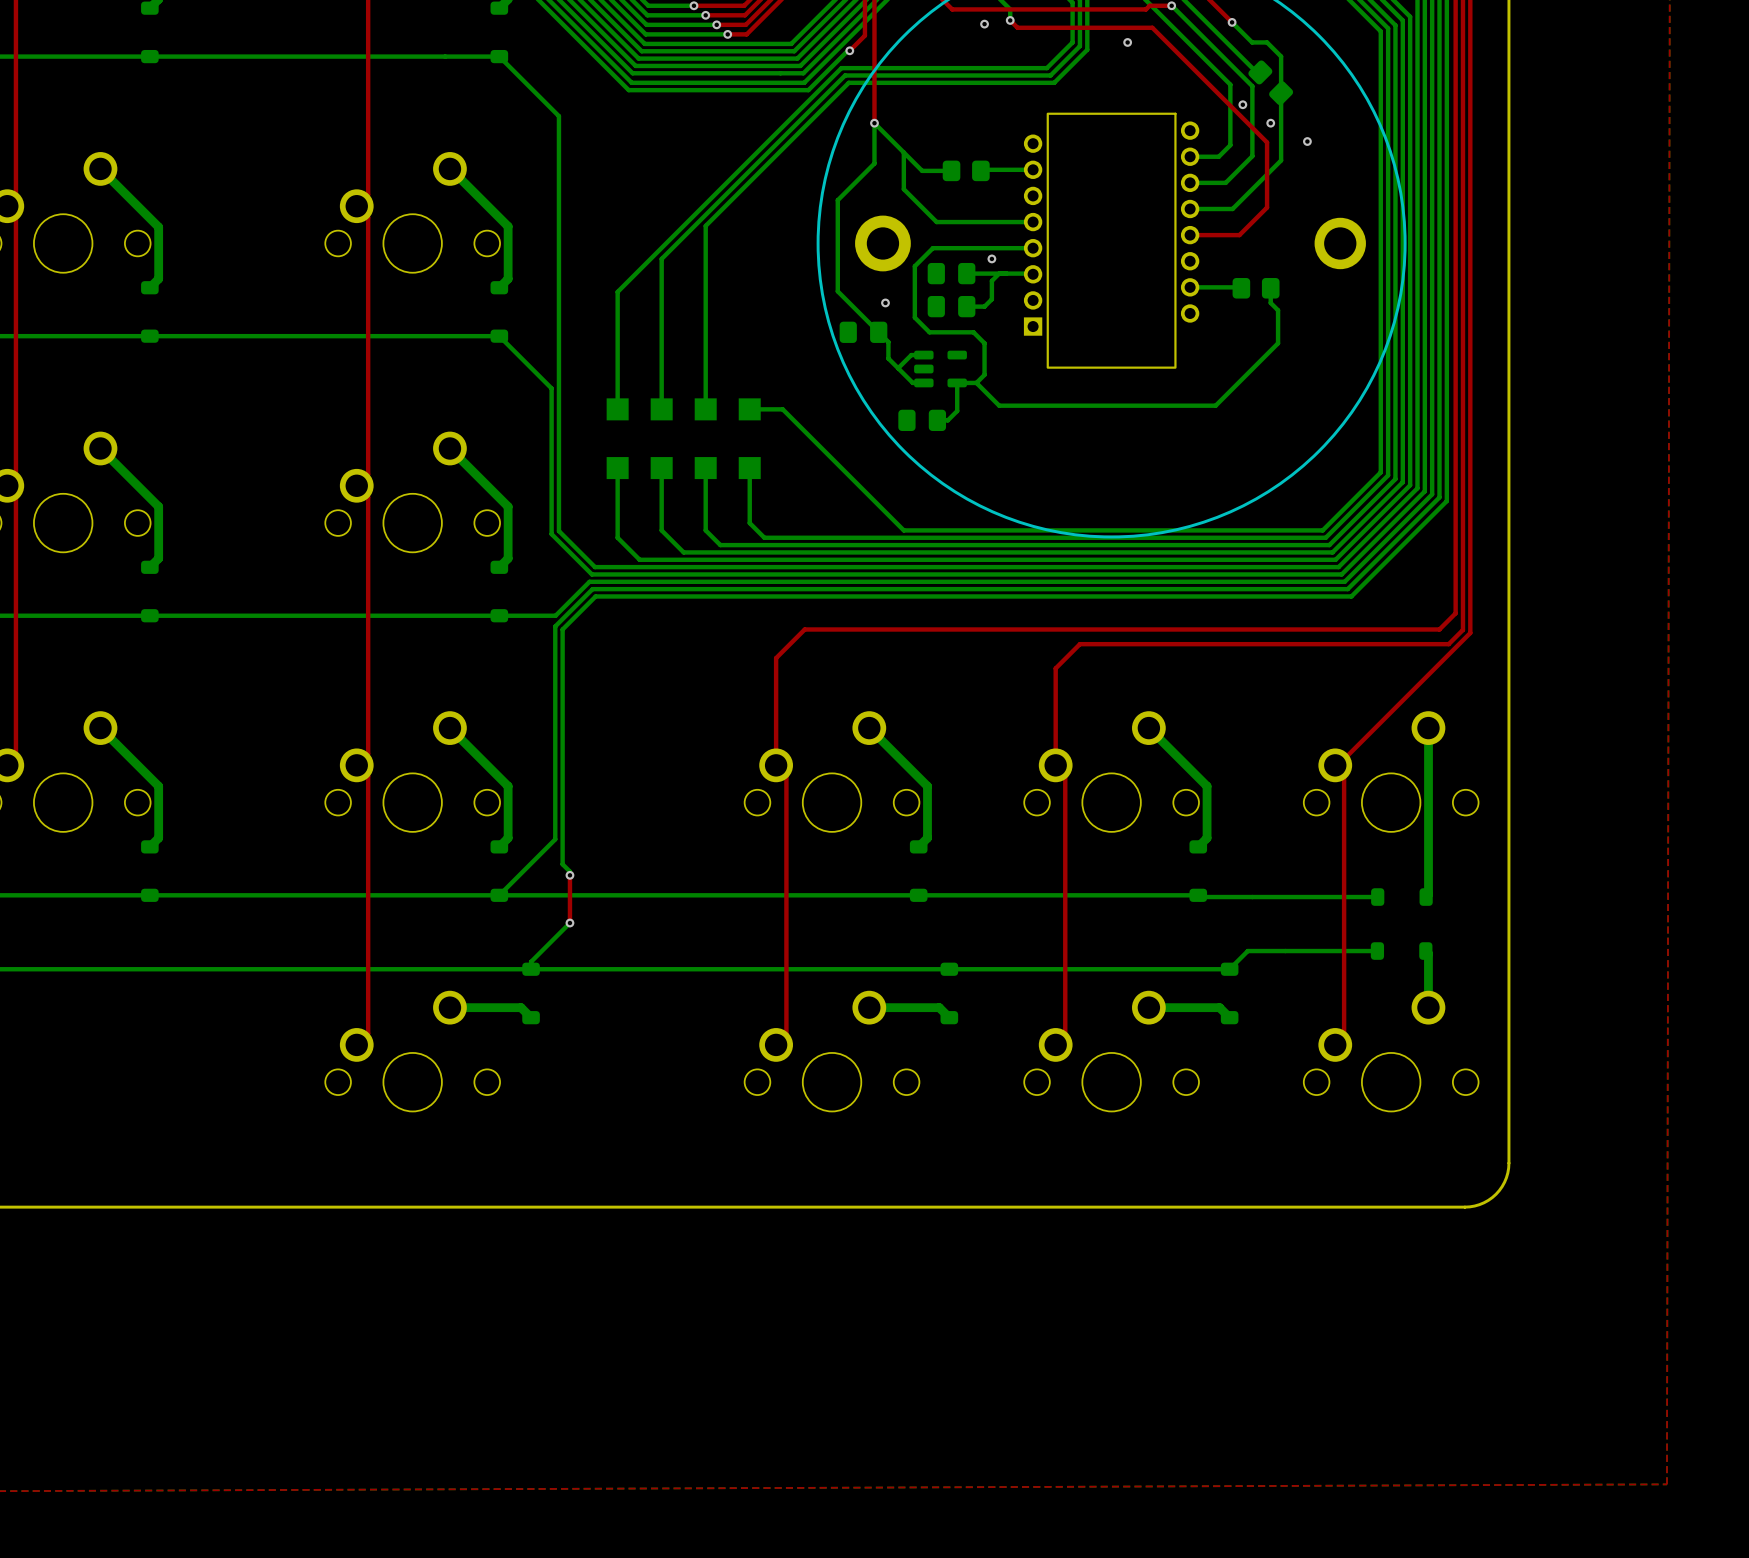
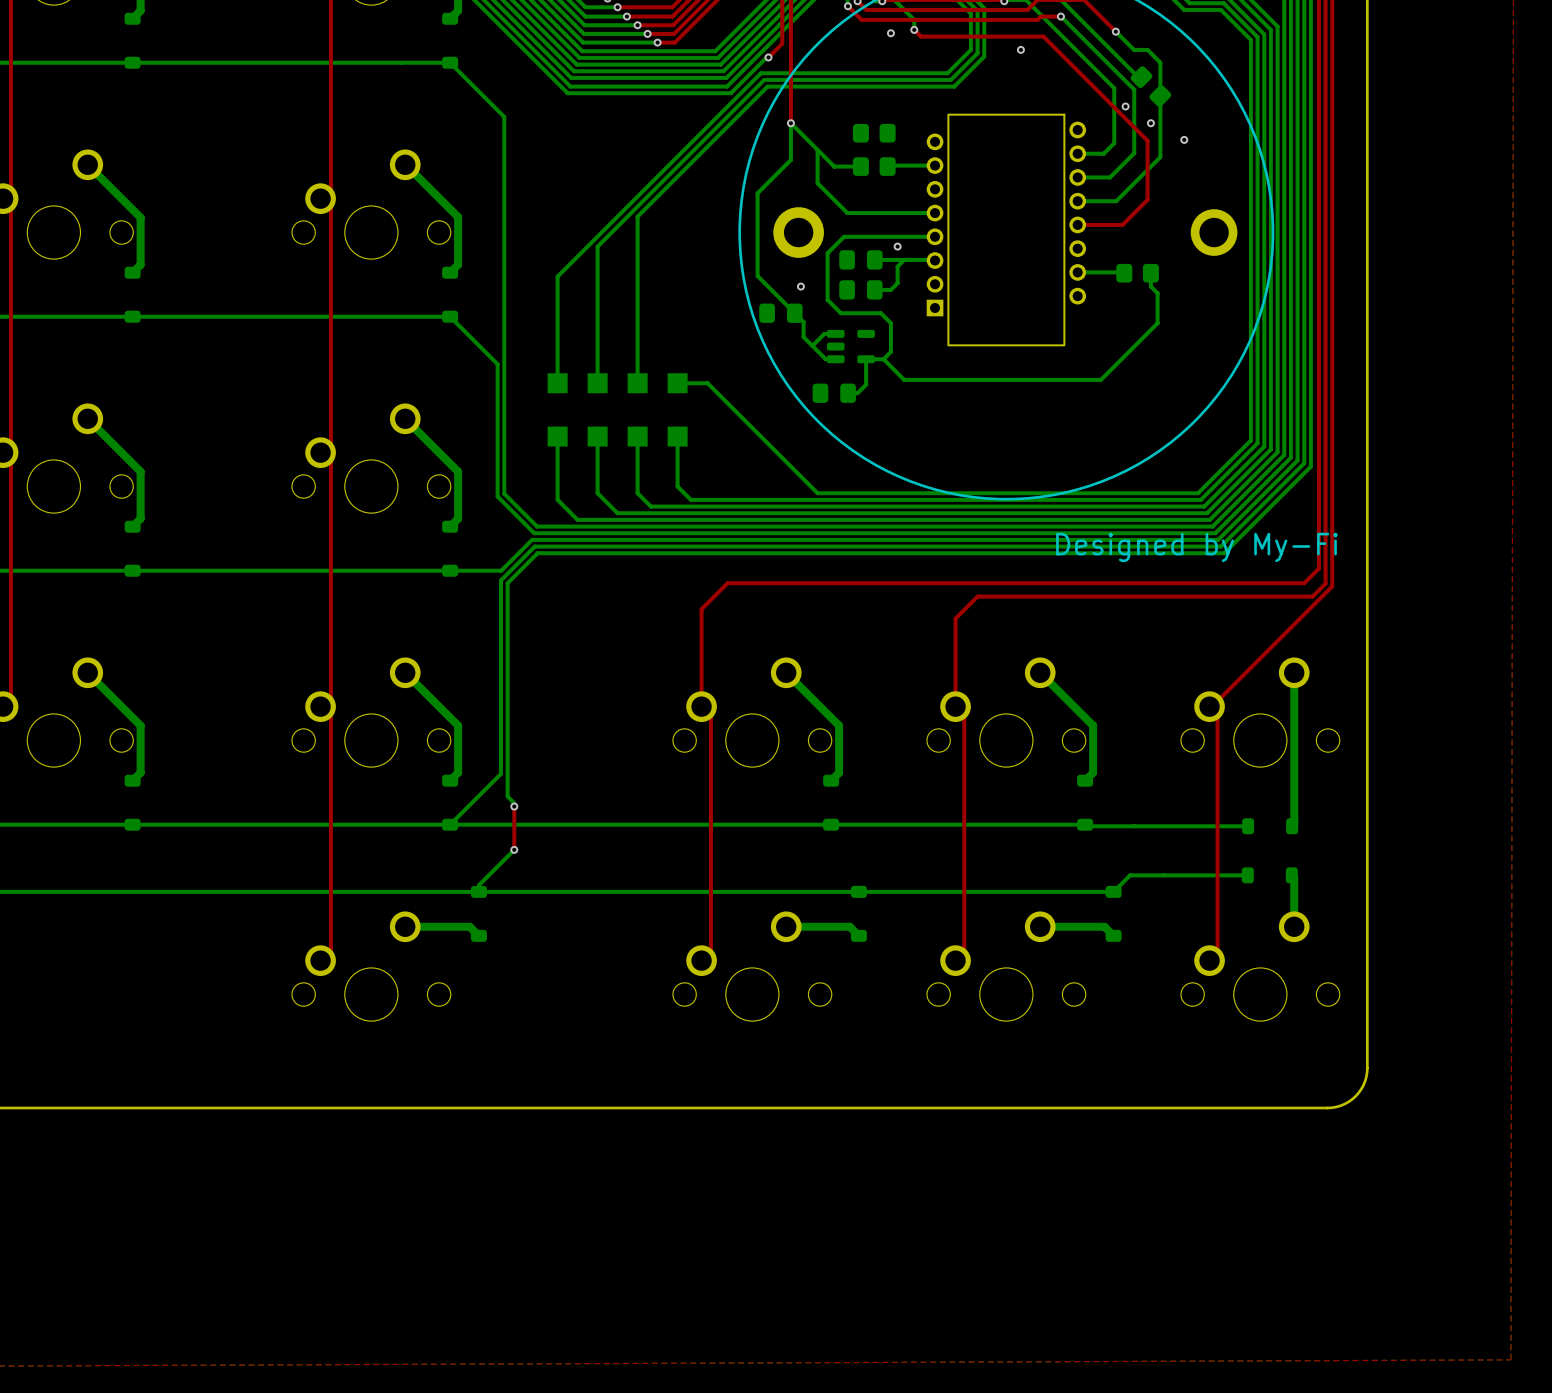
part: none -> (874, 133)
text: none -> Designed by My-Fi (1196, 547)

